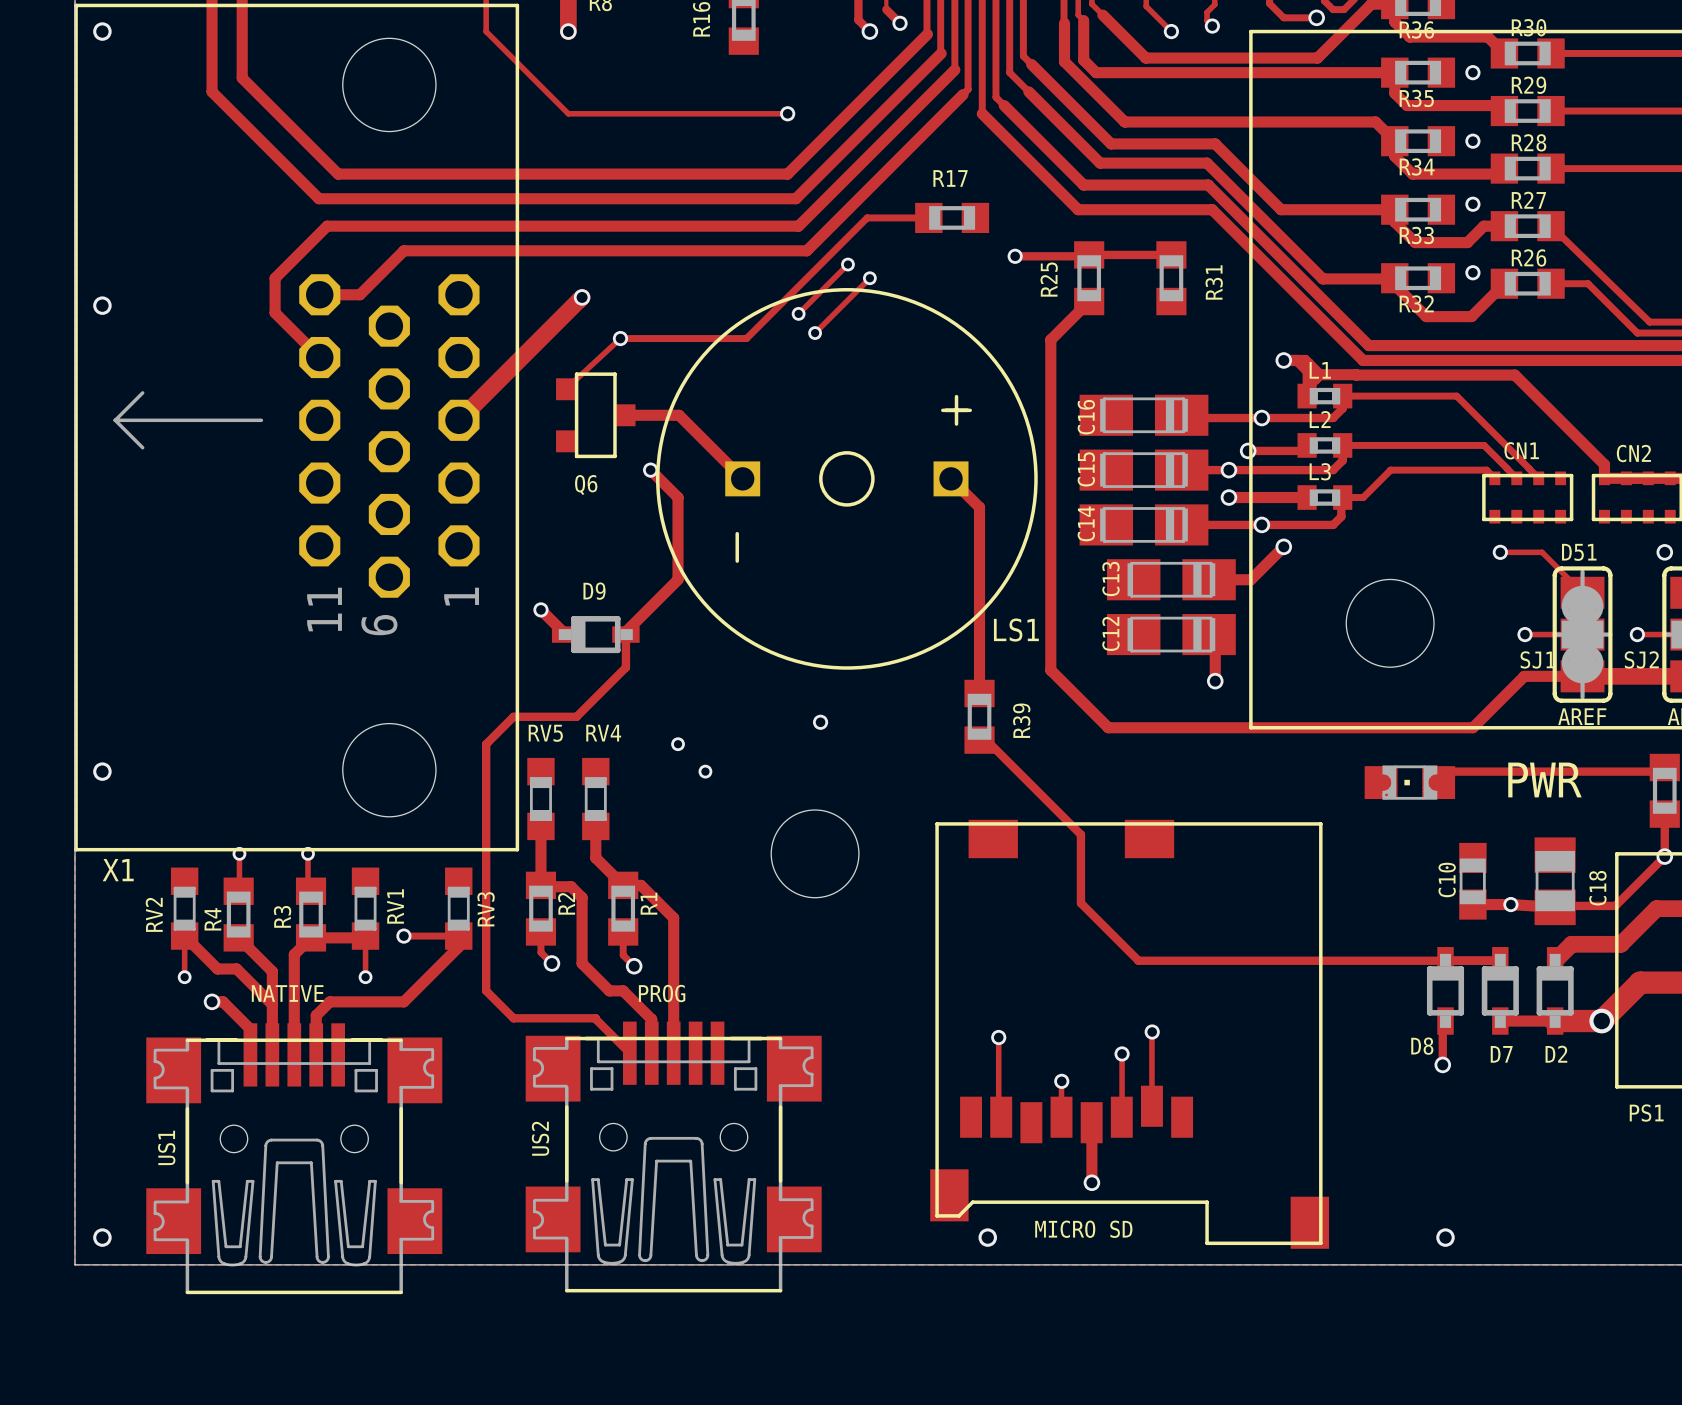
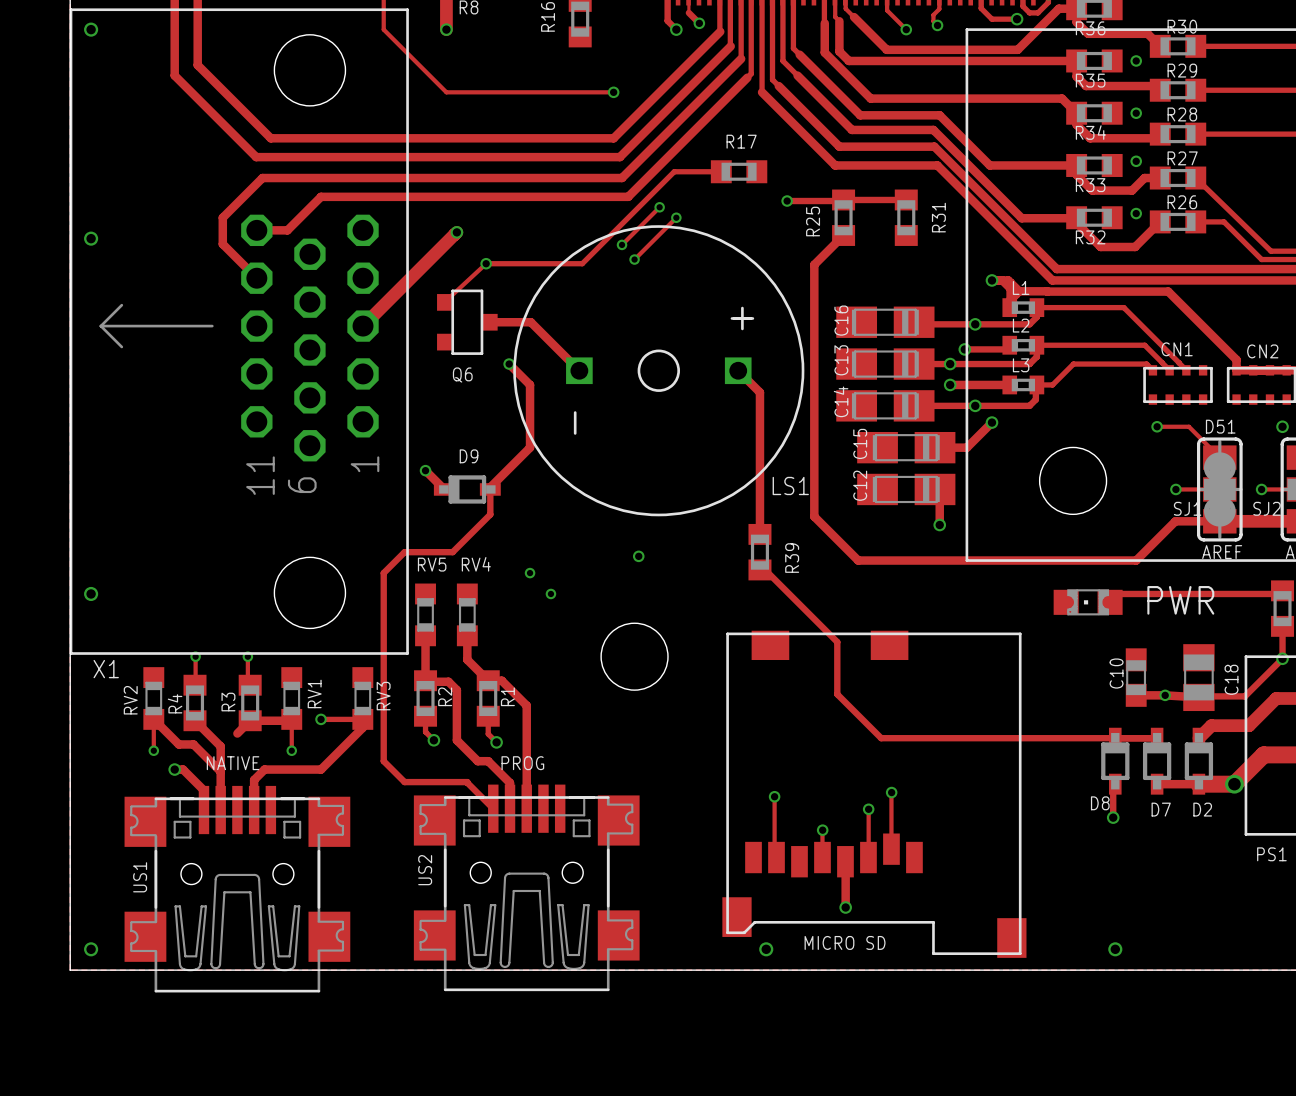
C15 name: C15 (1086, 469) -> C13 (841, 360)
C13 name: C13 (1110, 579) -> C15 (860, 443)
track: (294, 954) (294, 1054) -> none

